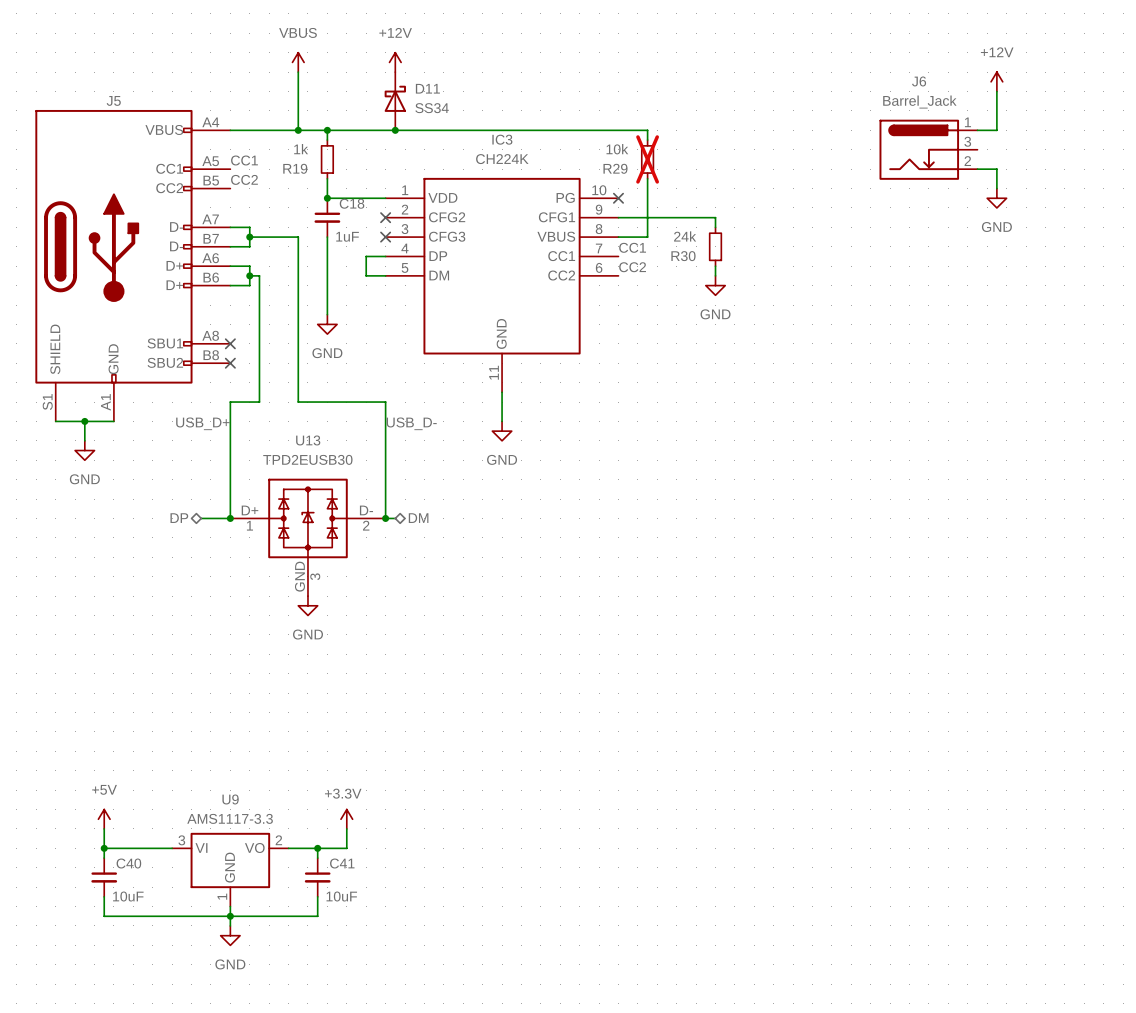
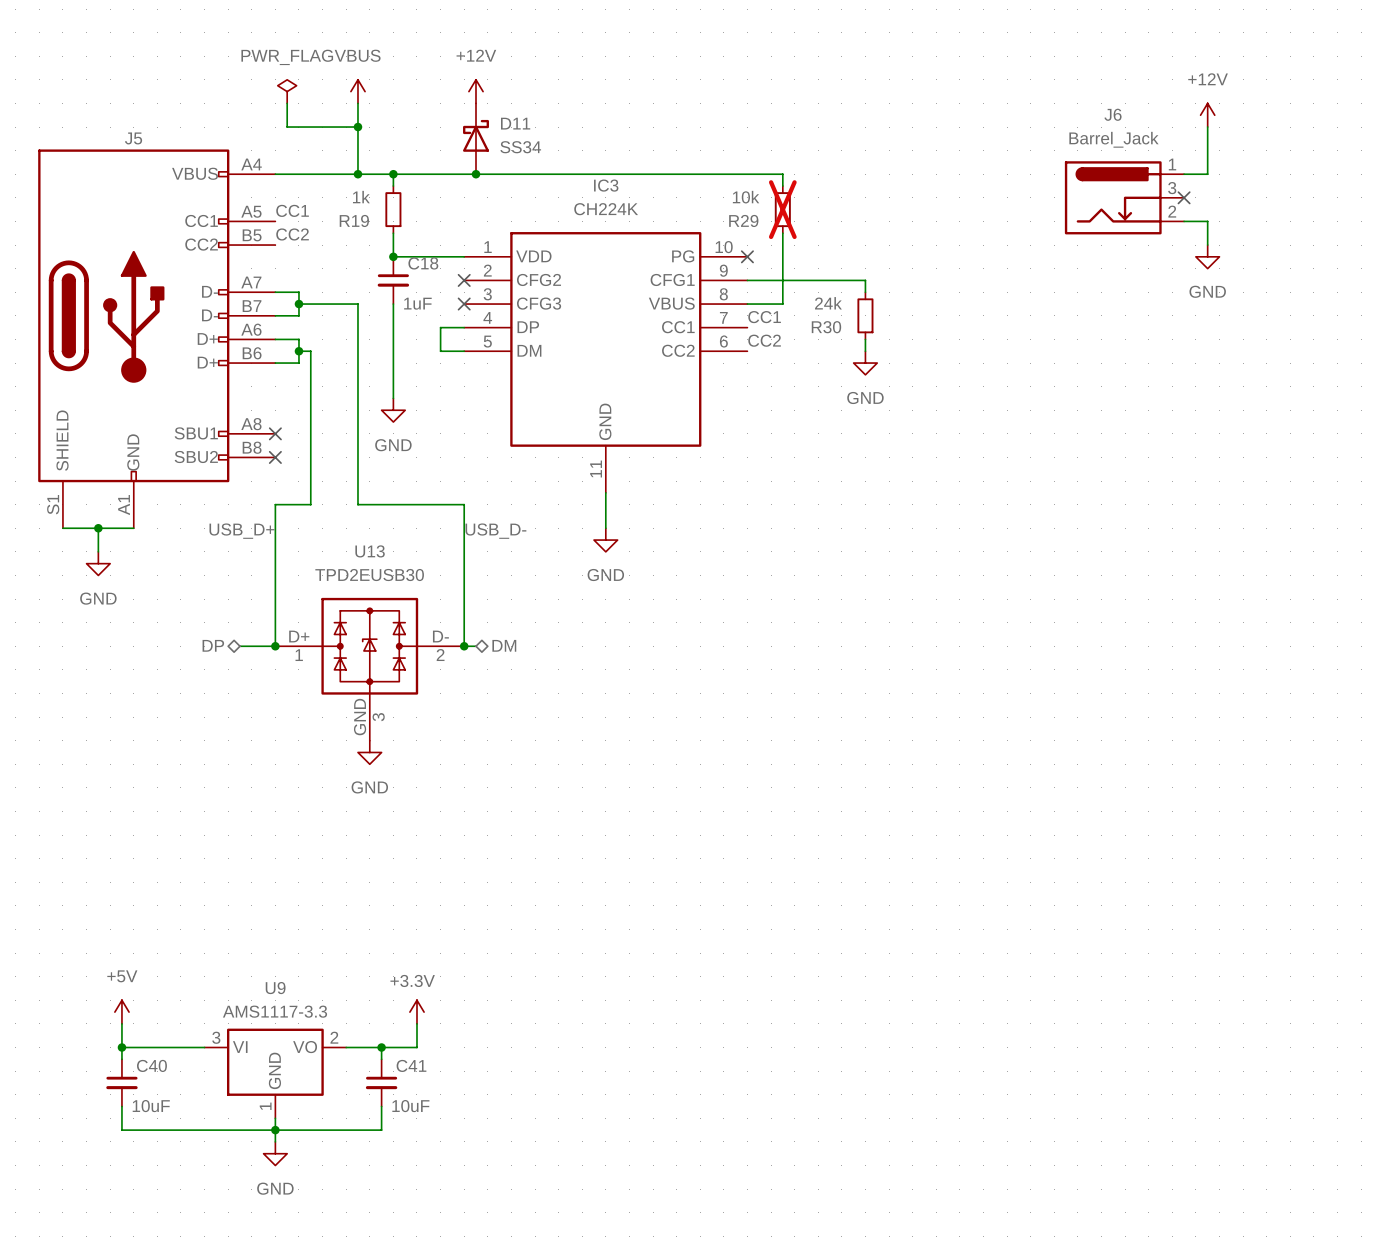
power symbol: none -> PWR_FLAG (287, 91)
wire: none -> (287, 103) (287, 127) (357, 127)
junction: none -> (357, 127)
no-connect mark: none -> (1184, 197)

